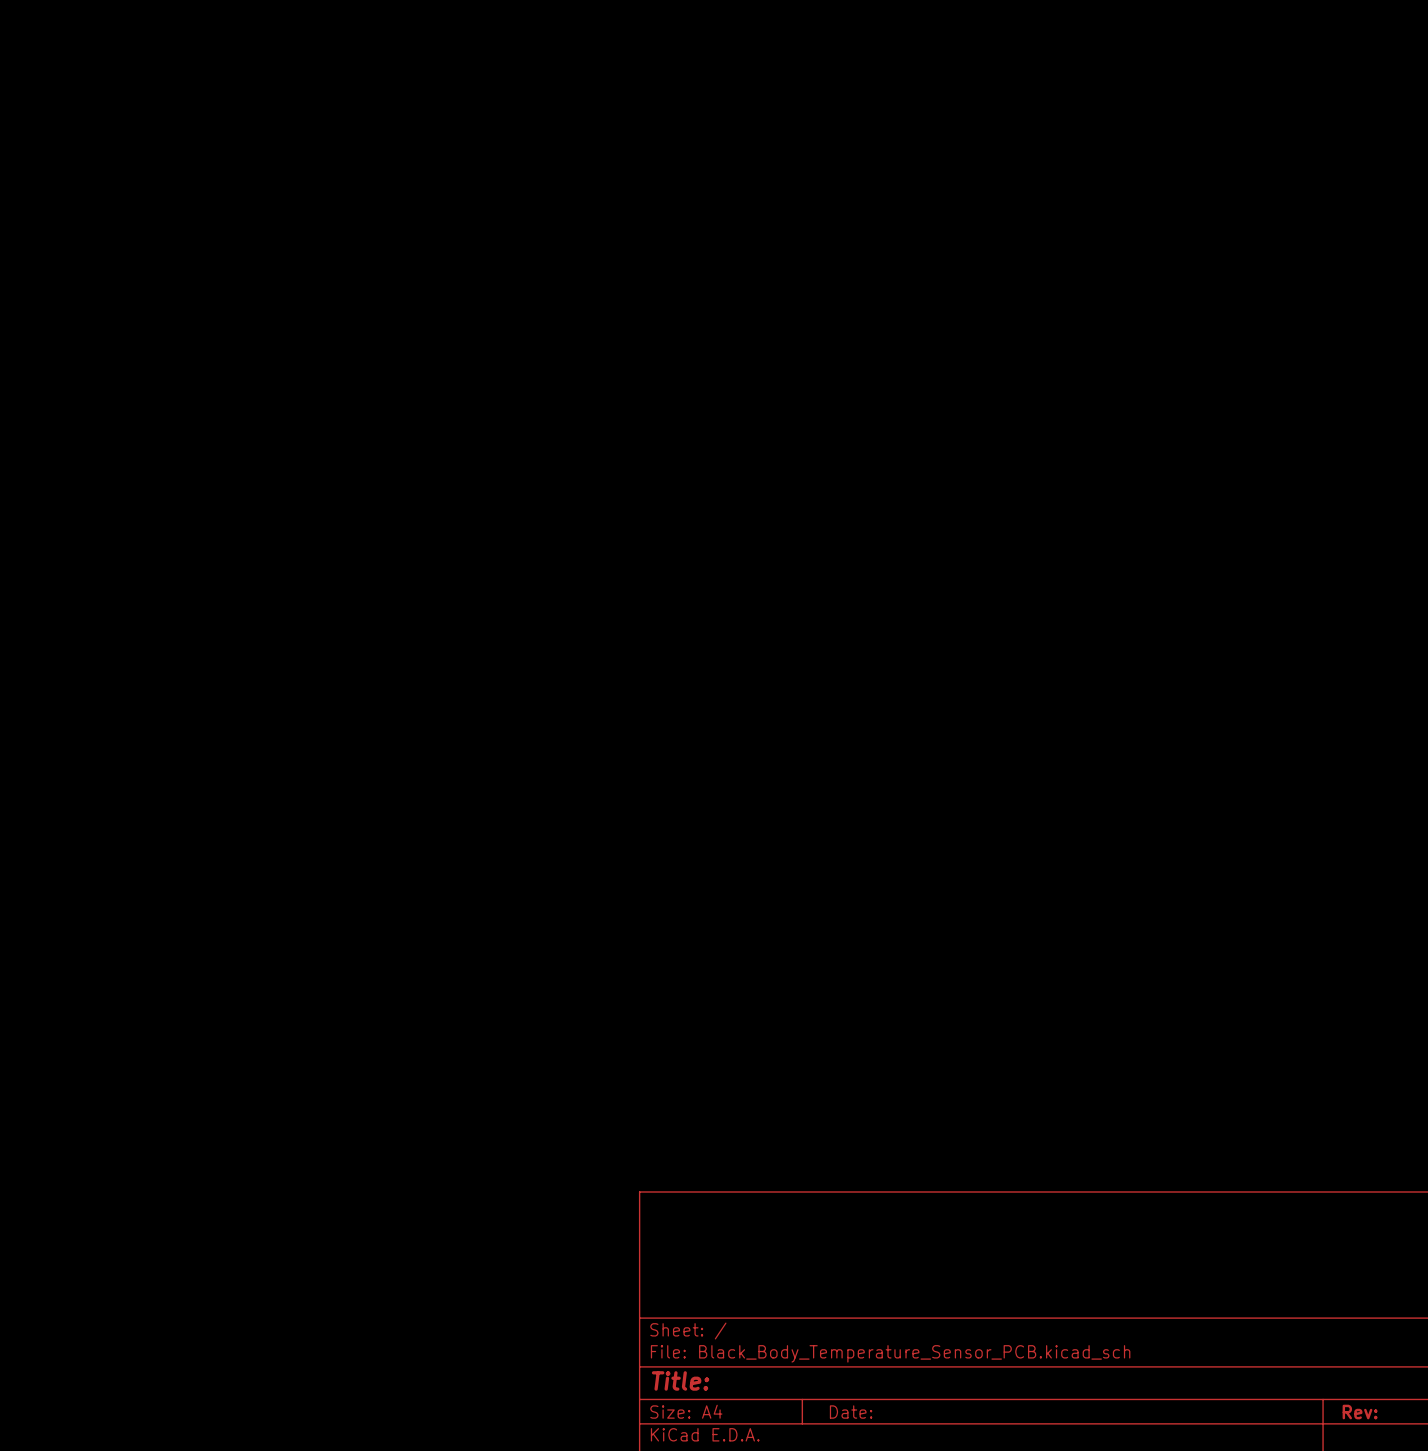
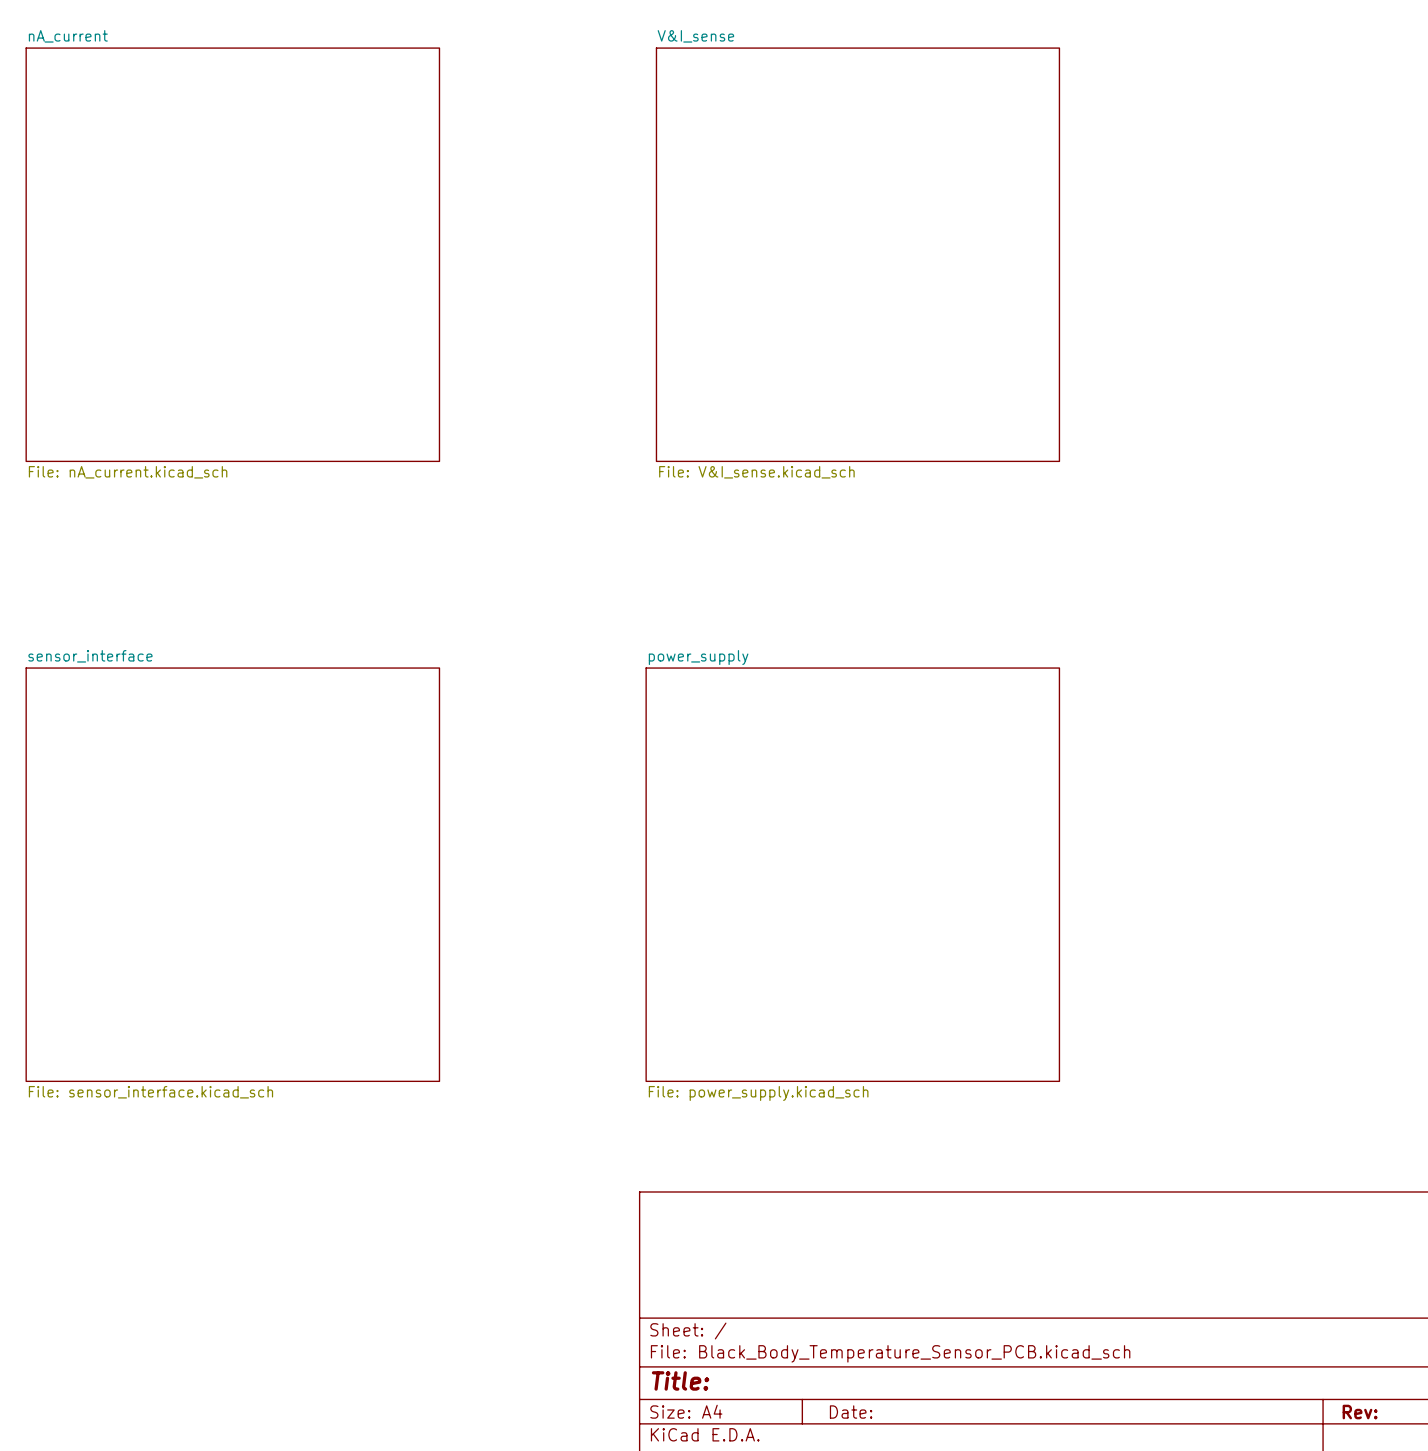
sheet nA_current: none -> File: nA_current.kicad_sch (232, 254)
sheet V&I_sense: none -> File: V&I_sense.kicad_sch (857, 254)
sheet sensor_interface: none -> File: sensor_interface.kicad_sch (232, 874)
sheet power_supply: none -> File: power_supply.kicad_sch (852, 874)

